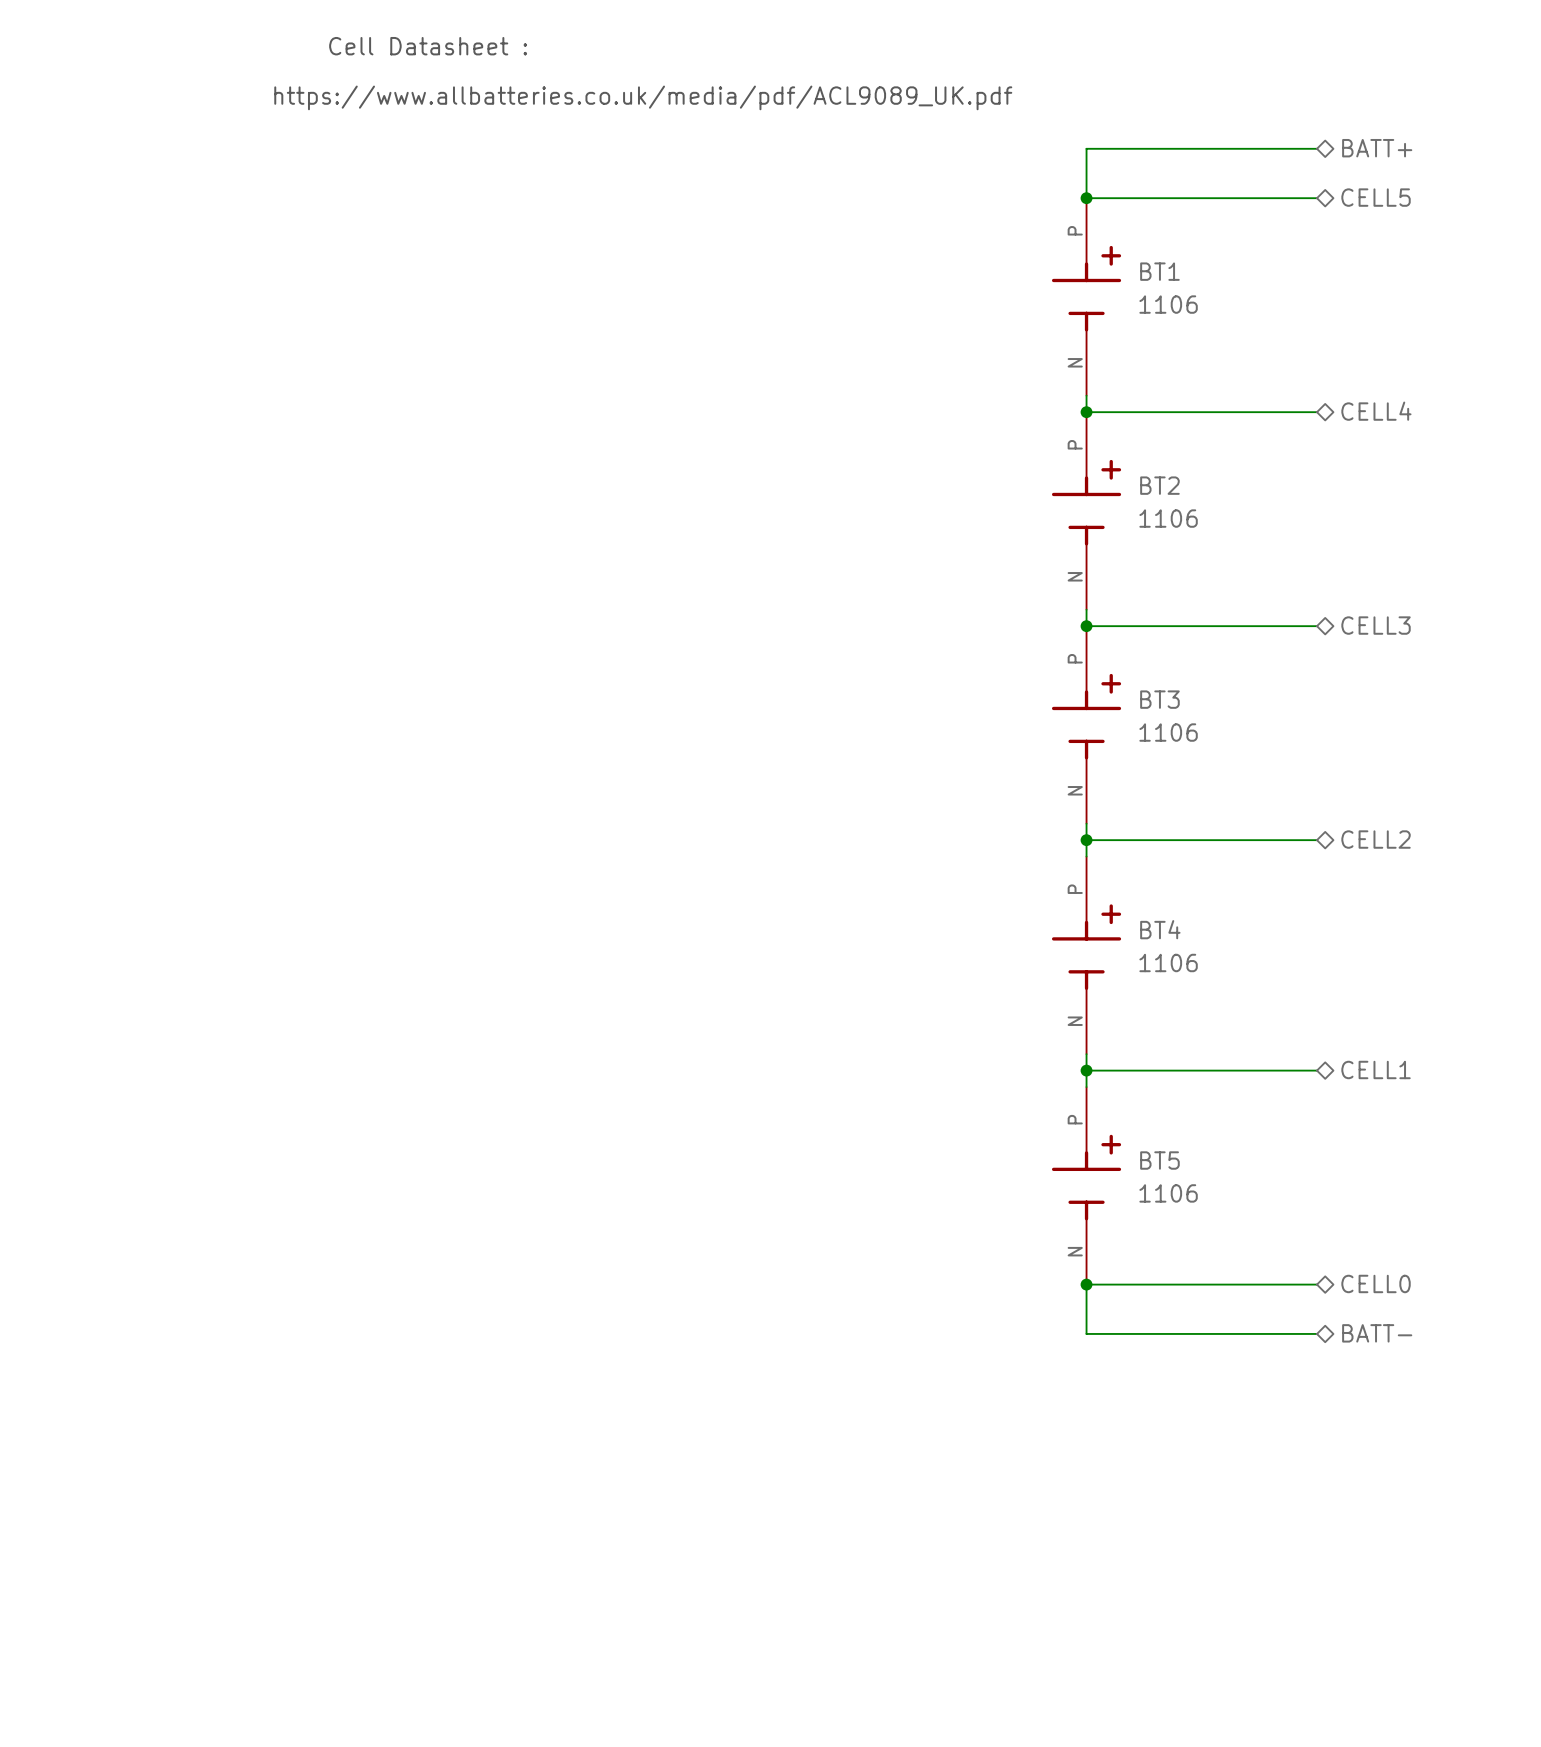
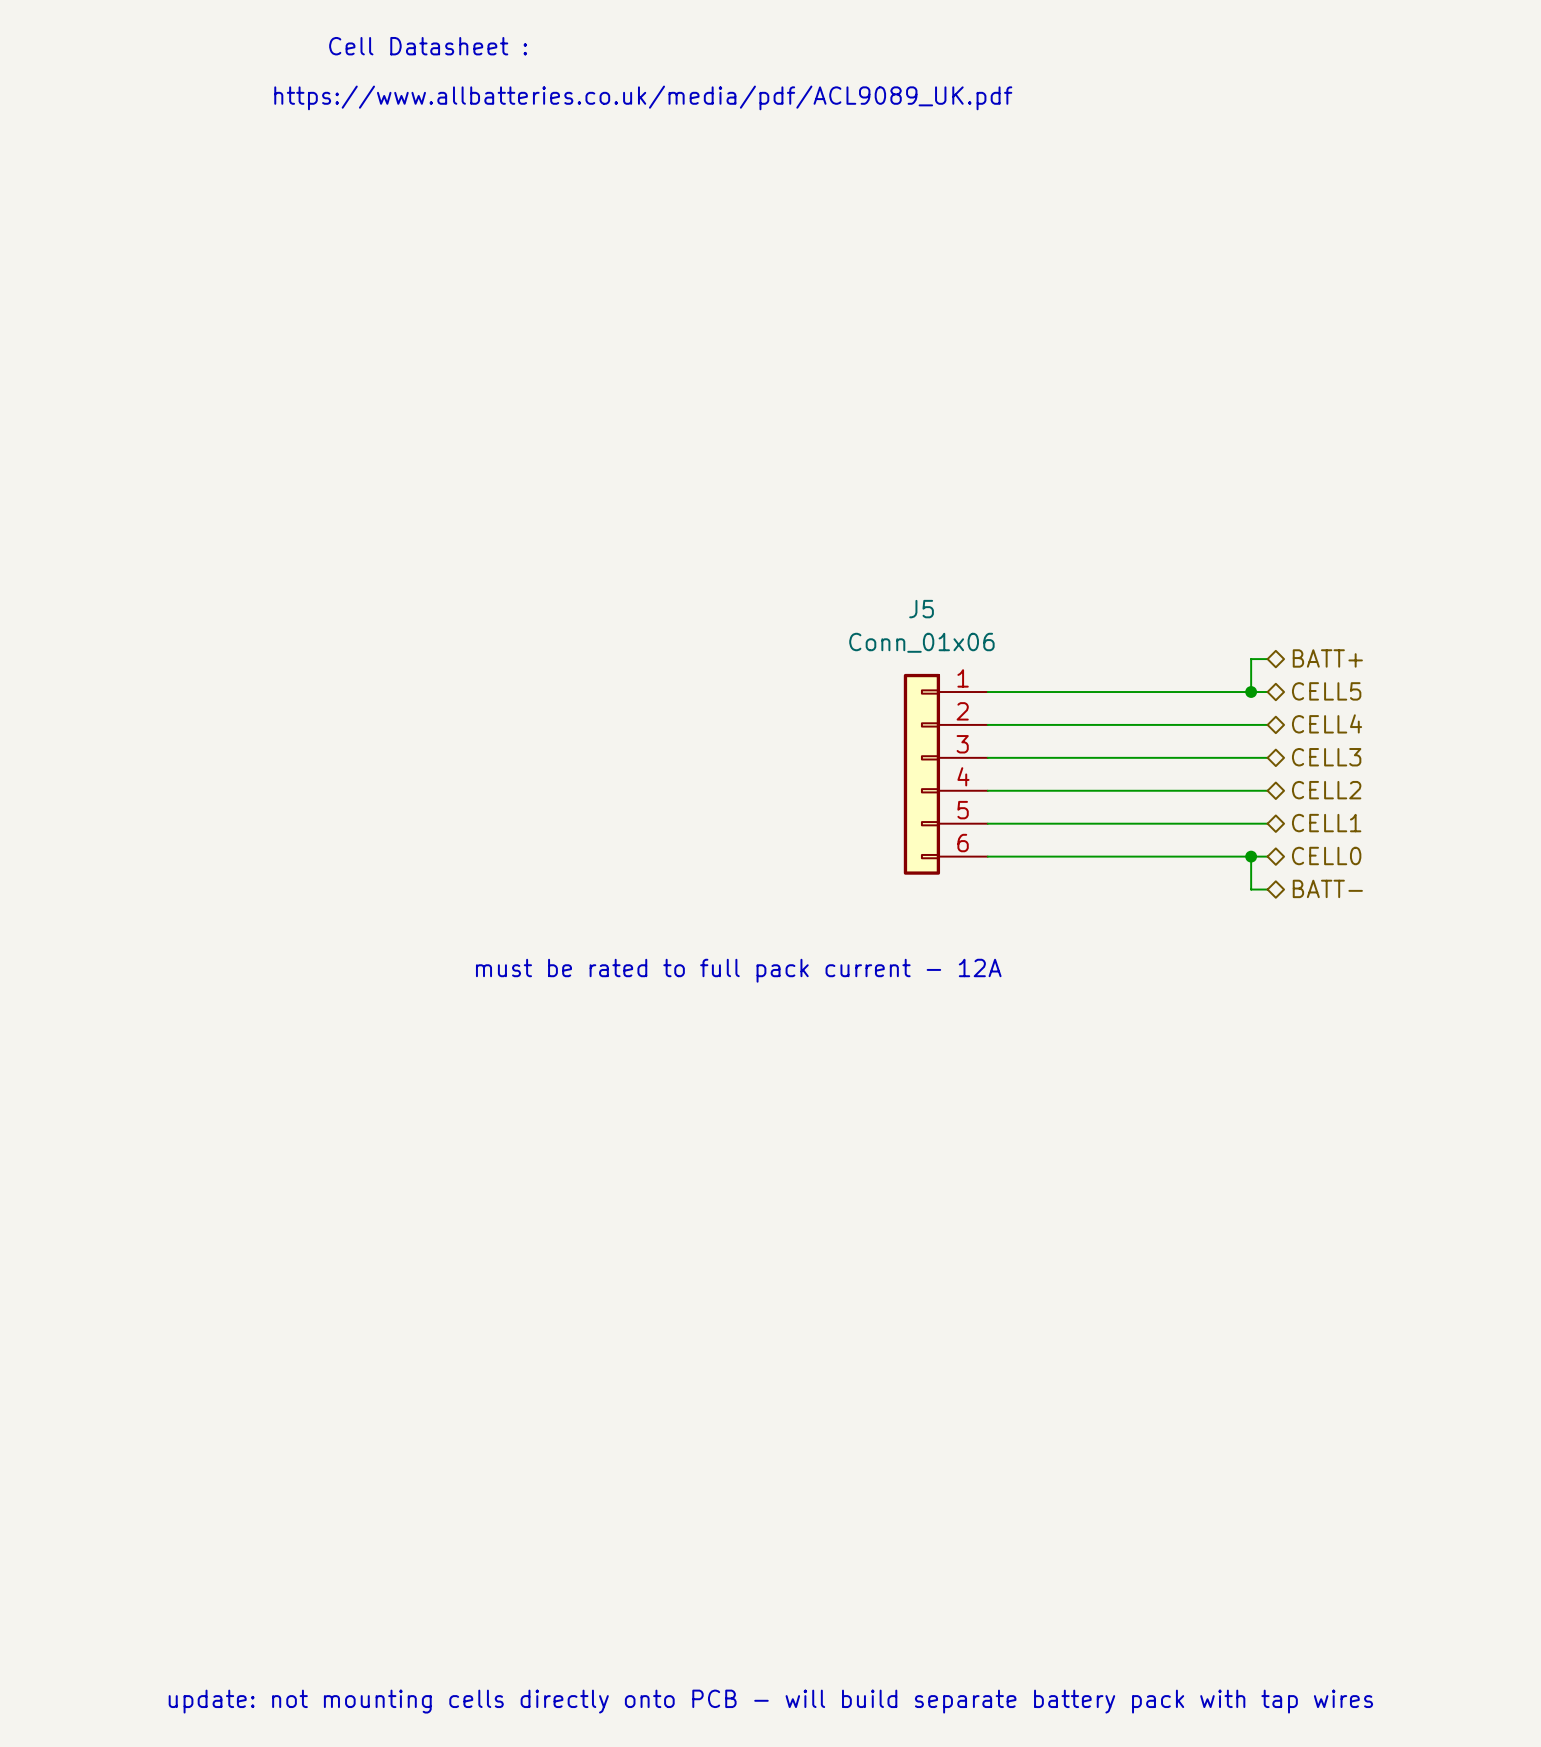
wire: (1316, 148) (1086, 148) (1086, 198) (1316, 198) -> none
hierarchical label: BATT+ (1377, 148) -> none
hierarchical label: CELL5 (1376, 197) -> none
junction: (1086, 198) -> none
BT1: 1106 (1086, 296) -> none
wire: (1086, 395) (1086, 412) (1316, 412) -> none
hierarchical label position: CELL4 (1376, 411) -> CELL4 (1327, 723)
junction: (1086, 412) -> none
BT2: 1106 (1086, 510) -> none
wire: (1086, 609) (1086, 626) (1316, 626) -> none
hierarchical label position: CELL3 (1376, 625) -> CELL3 (1326, 757)
junction: (1086, 626) -> none
hierarchical label: none -> BATT+ (1327, 658)
wire: none -> (1267, 659) (1251, 659) (1251, 692)
hierarchical label: none -> CELL5 (1326, 691)
wire: none -> (987, 692) (1267, 692)
junction: none -> (1251, 692)
wire: none -> (987, 724) (1267, 724)
BT3: 1106 (1086, 724) -> none
wire: none -> (987, 757) (1267, 757)
J5: none -> Conn_01x06 (945, 774)
wire: none -> (987, 790) (1267, 790)
wire: none -> (987, 823) (1267, 823)
wire: (1086, 823) (1086, 856) -> none
hierarchical label position: CELL2 (1376, 839) -> CELL2 (1326, 790)
wire: (1086, 840) (1316, 840) -> none
junction: (1086, 840) -> none
wire: none -> (987, 856) (1267, 856)
wire: none -> (1251, 856) (1251, 889) (1267, 889)
junction: none -> (1251, 856)
hierarchical label: none -> CELL0 (1326, 856)
hierarchical label: none -> BATT- (1327, 888)
BT4: 1106 (1086, 955) -> none
text: none -> must be rated to full pack current - 12A (738, 970)
wire: (1086, 1054) (1086, 1087) -> none
hierarchical label position: CELL1 (1376, 1069) -> CELL1 (1326, 823)
wire: (1086, 1070) (1316, 1070) -> none
junction: (1086, 1070) -> none
BT5: 1106 (1086, 1185) -> none
hierarchical label: CELL0 (1376, 1283) -> none
junction: (1086, 1284) -> none
wire: (1316, 1284) (1086, 1284) (1086, 1333) (1316, 1333) -> none
hierarchical label: BATT- (1377, 1333) -> none
text: none -> update: not mounting cells directly onto PCB - will build separate battery pack with tap wires (770, 1701)

